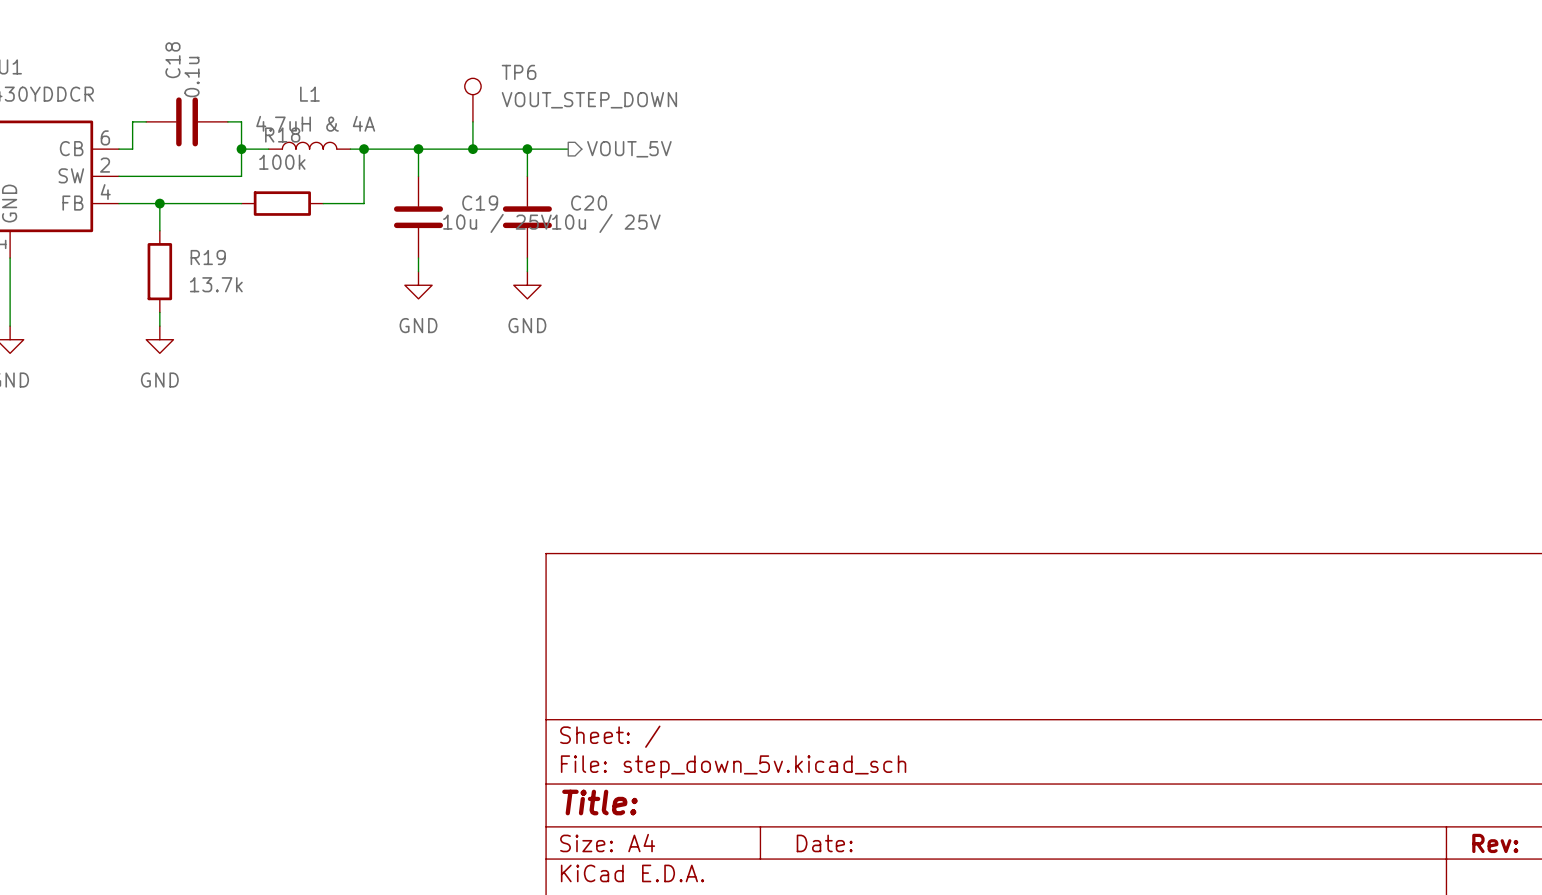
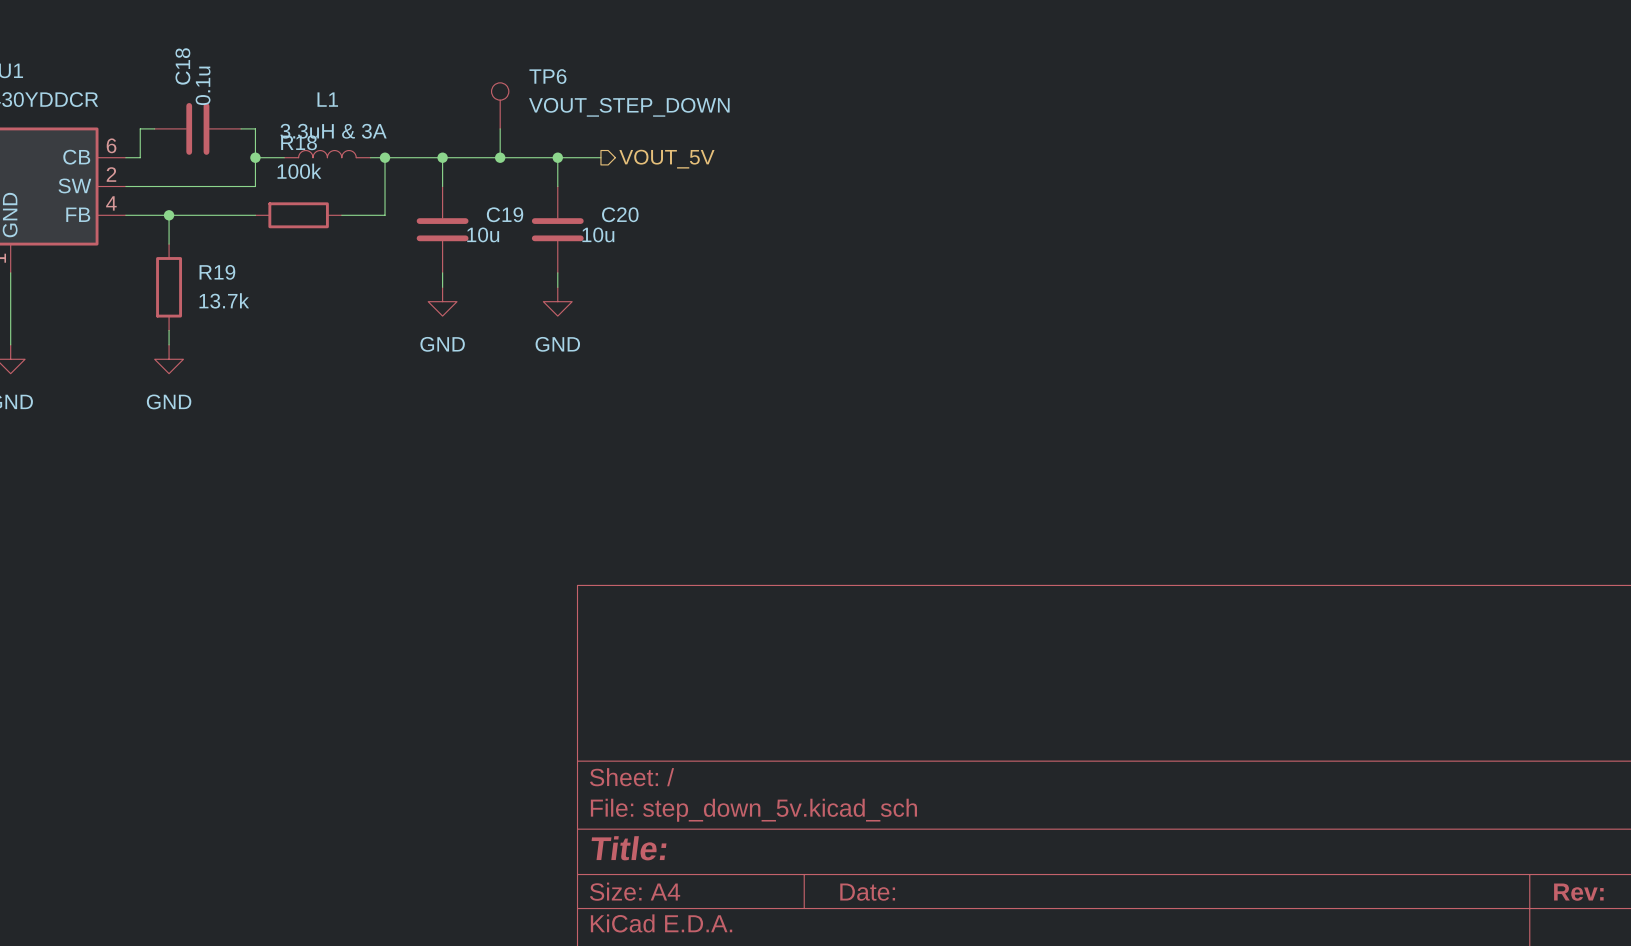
L1 value: 4.7uH & 4A (315, 123) -> 3.3uH & 3A (333, 131)
C19 value: 10u / 25V (497, 223) -> 10u (483, 234)
C20 value: 10u / 25V (606, 223) -> 10u (598, 234)

